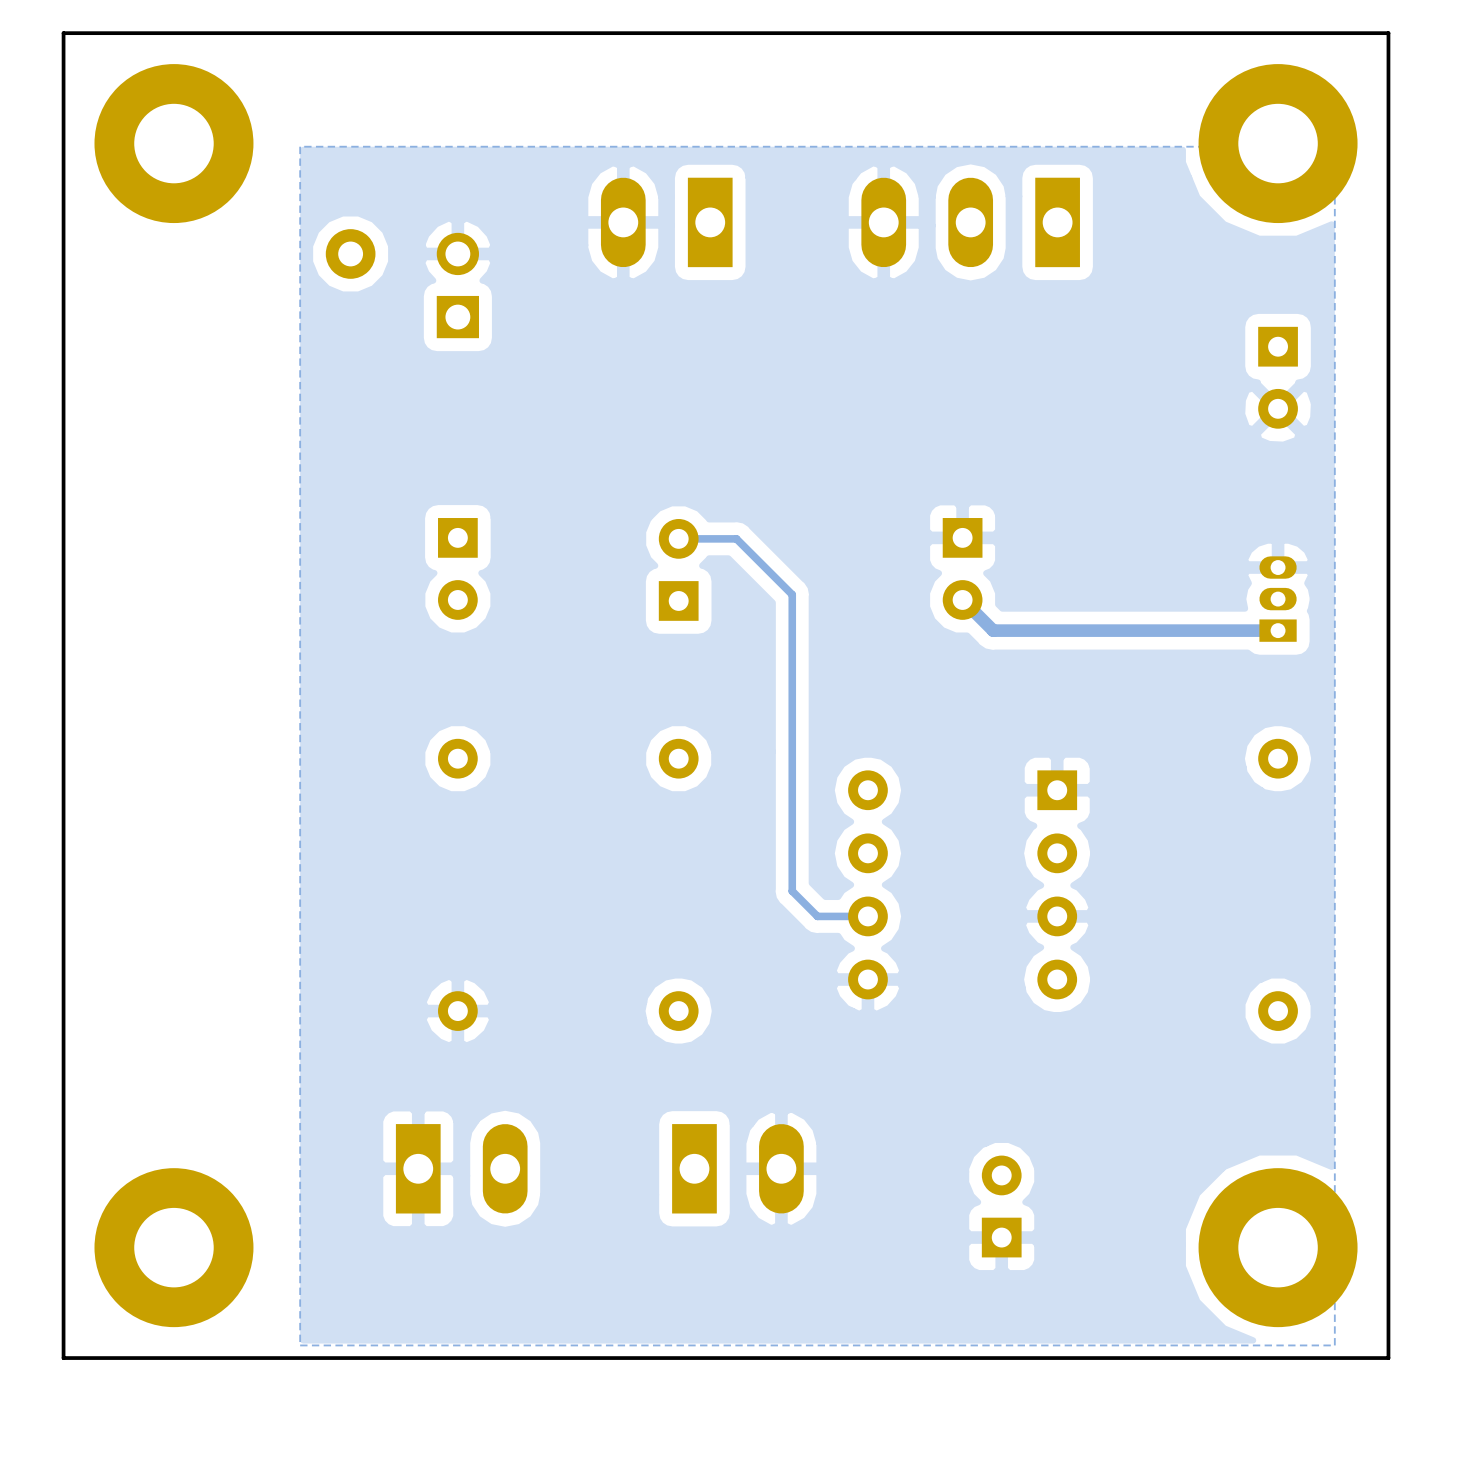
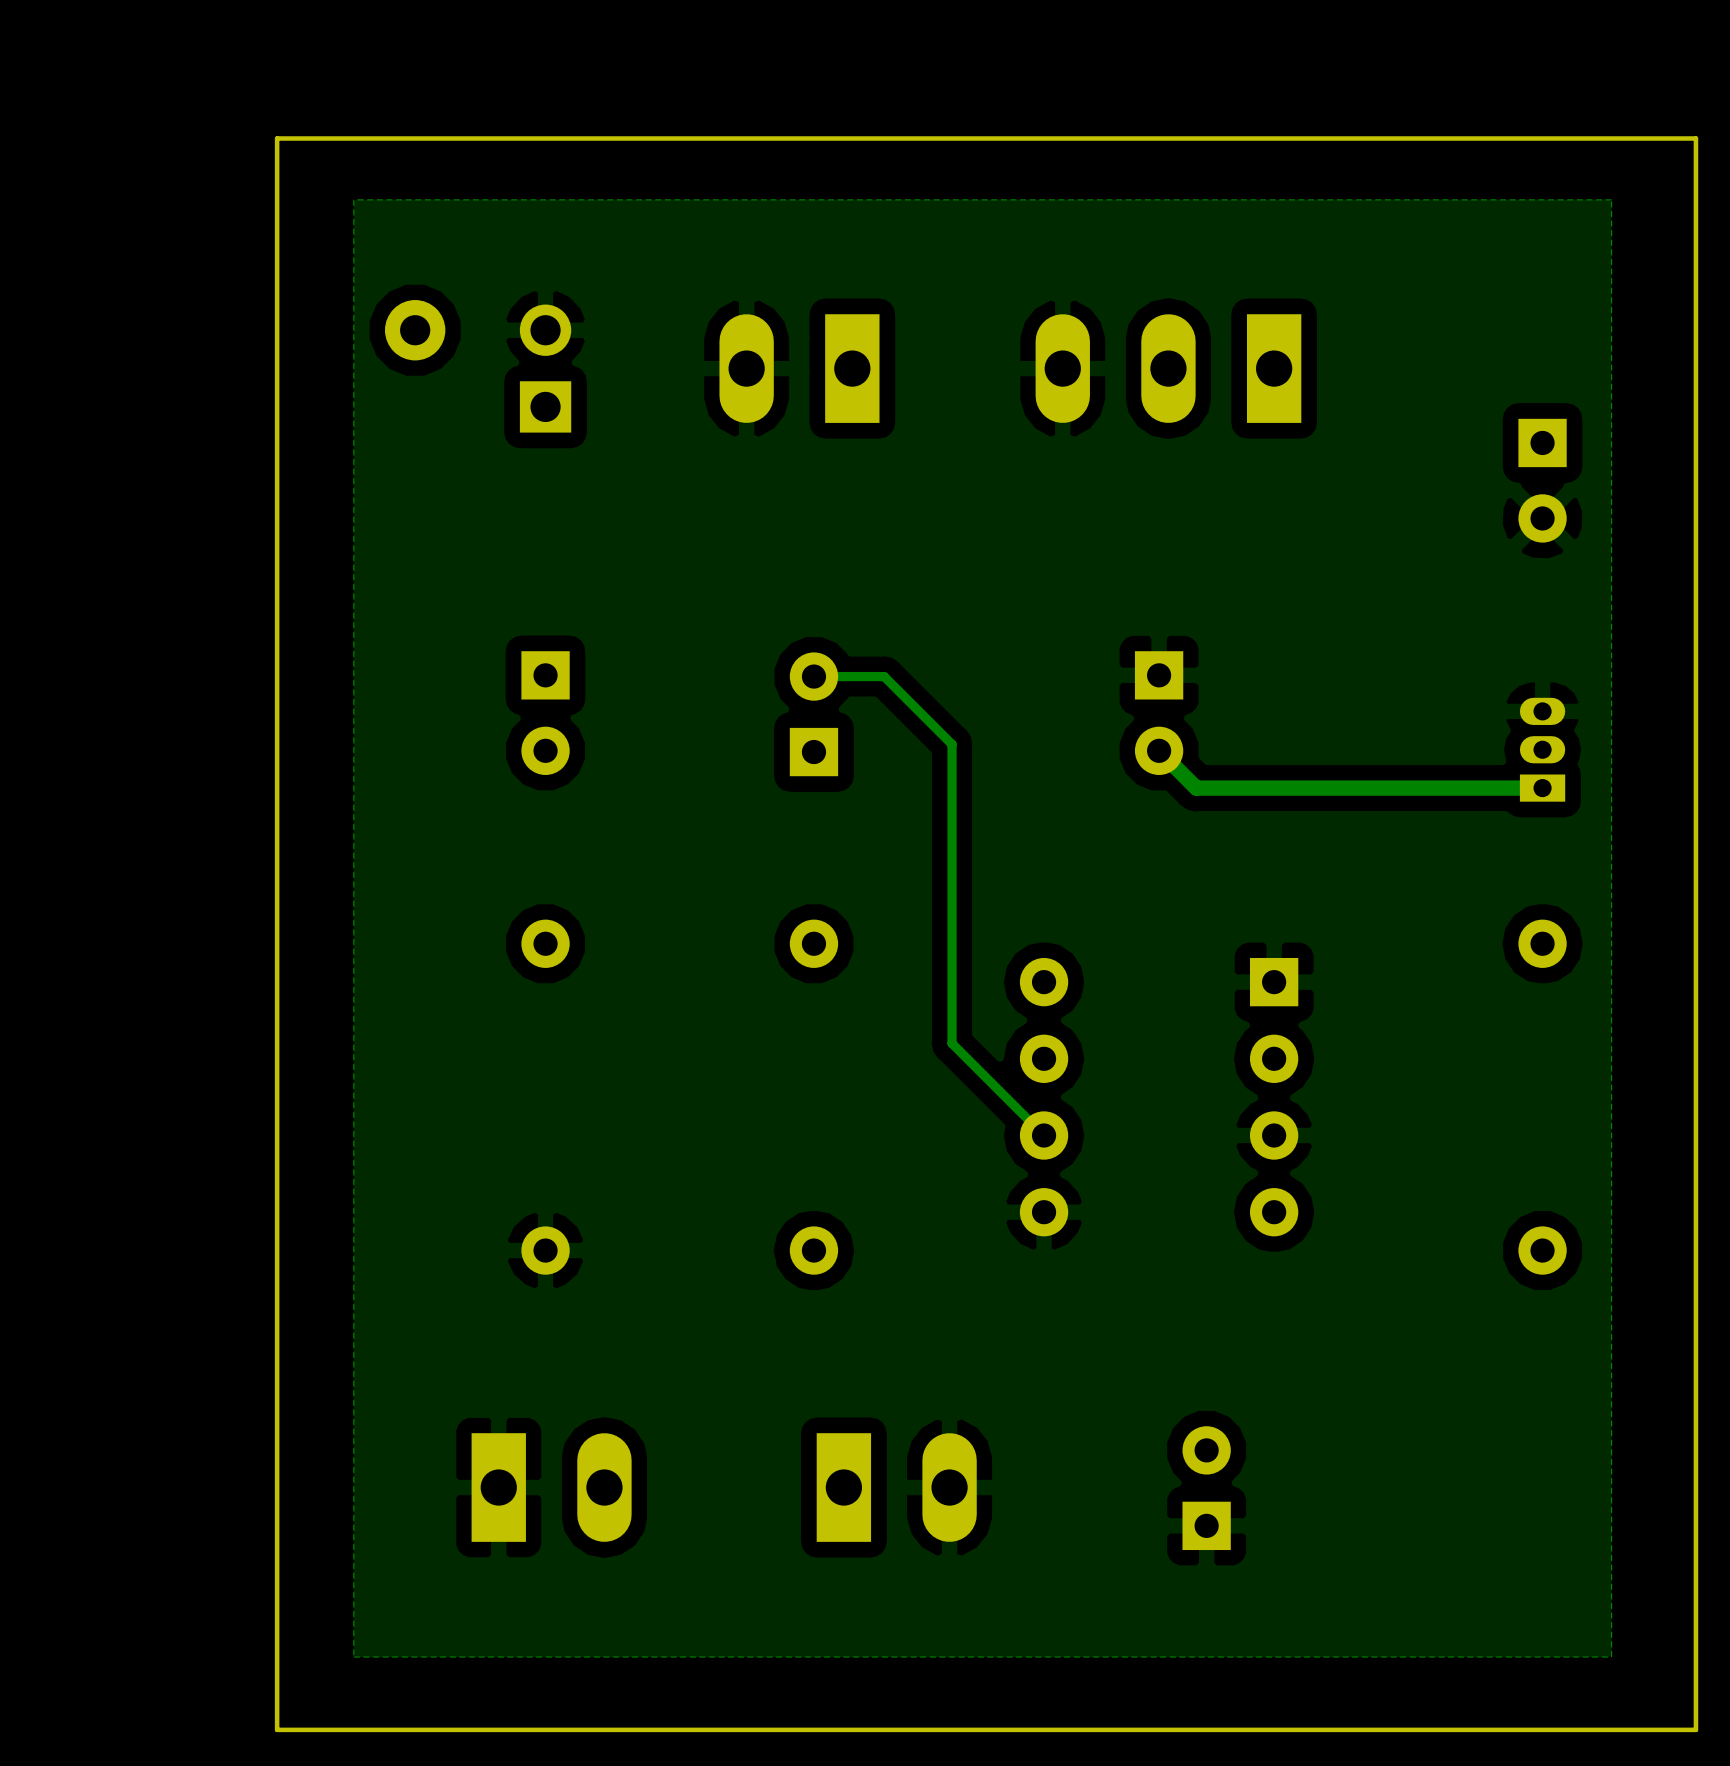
board edge: (1388, 33) (1388, 1358) (63, 1358) (63, 33) (1388, 33) -> (1695, 138) (1695, 1729) (277, 1729) (277, 138) (1695, 138)
part: (173, 143) -> none
part: (1278, 143) -> none
part position: (666, 222) -> (799, 368)
part position: (970, 222) -> (1168, 368)
track: (792, 840) (792, 891) (817, 916) (867, 916) -> (952, 1043) (1044, 1135)
part position: (461, 1168) -> (551, 1487)
part position: (737, 1168) -> (896, 1487)
part: (173, 1247) -> none
part: (1278, 1247) -> none

